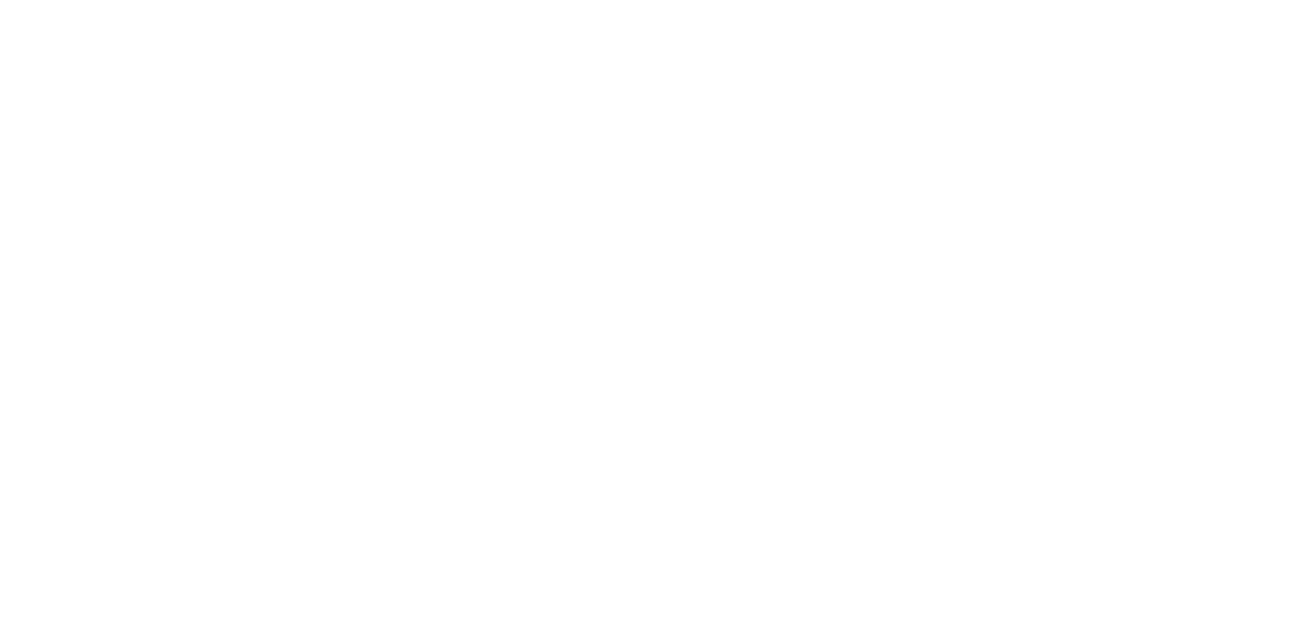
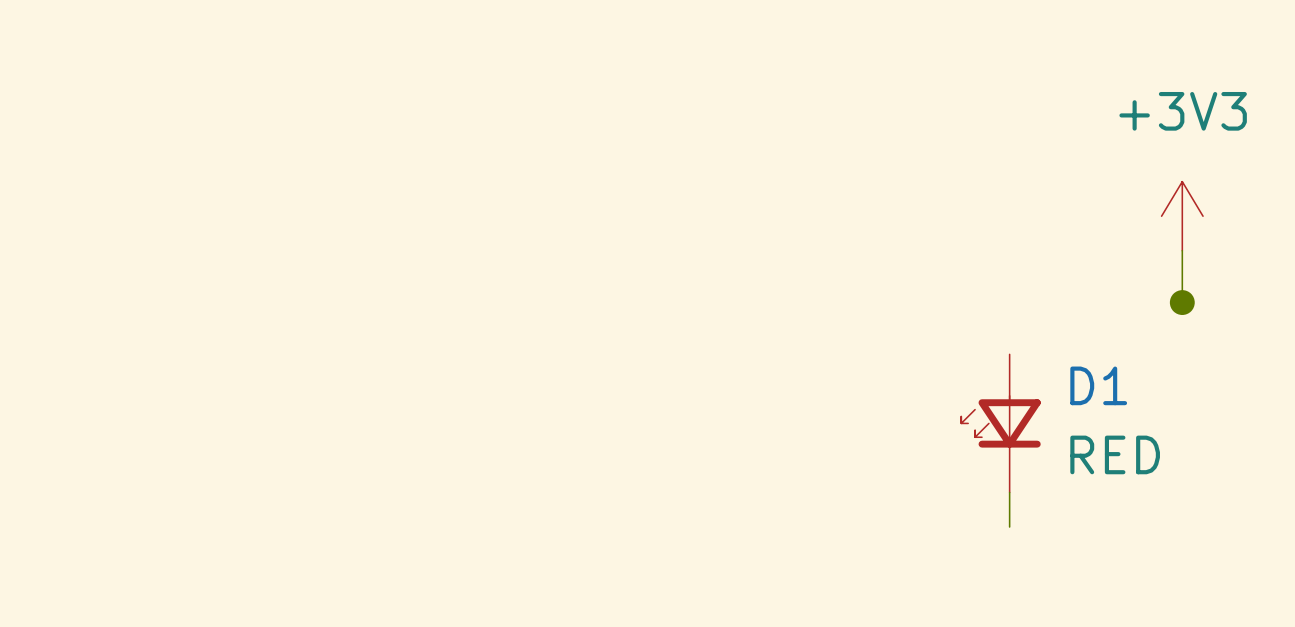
power symbol: none -> +3V3 (1182, 216)
wire: none -> (1182, 250) (1182, 302)
junction: none -> (1182, 302)
D1: none -> RED (1001, 423)
wire: none -> (1009, 492) (1009, 527)

